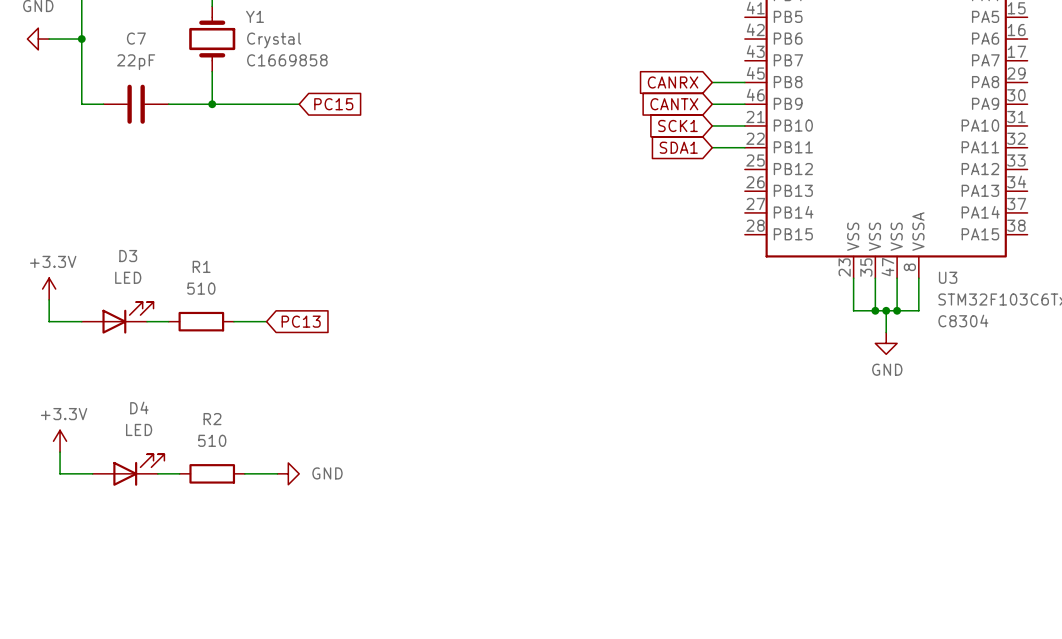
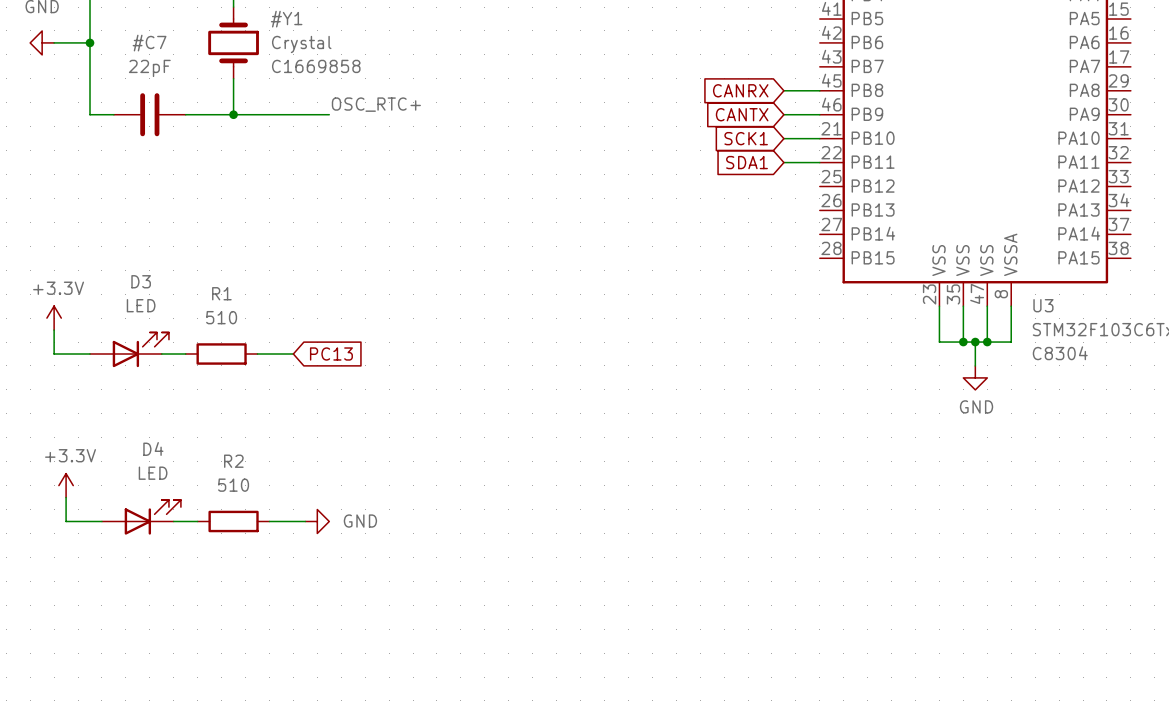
Y1: Crystal (212, 39) -> none
#Y1: none -> Crystal (233, 42)
label: none -> OSC_RTC+ (376, 104)
C7: 22pF (136, 104) -> none
#C7: none -> 22pF (149, 114)
global label: PC15 (333, 104) -> none

